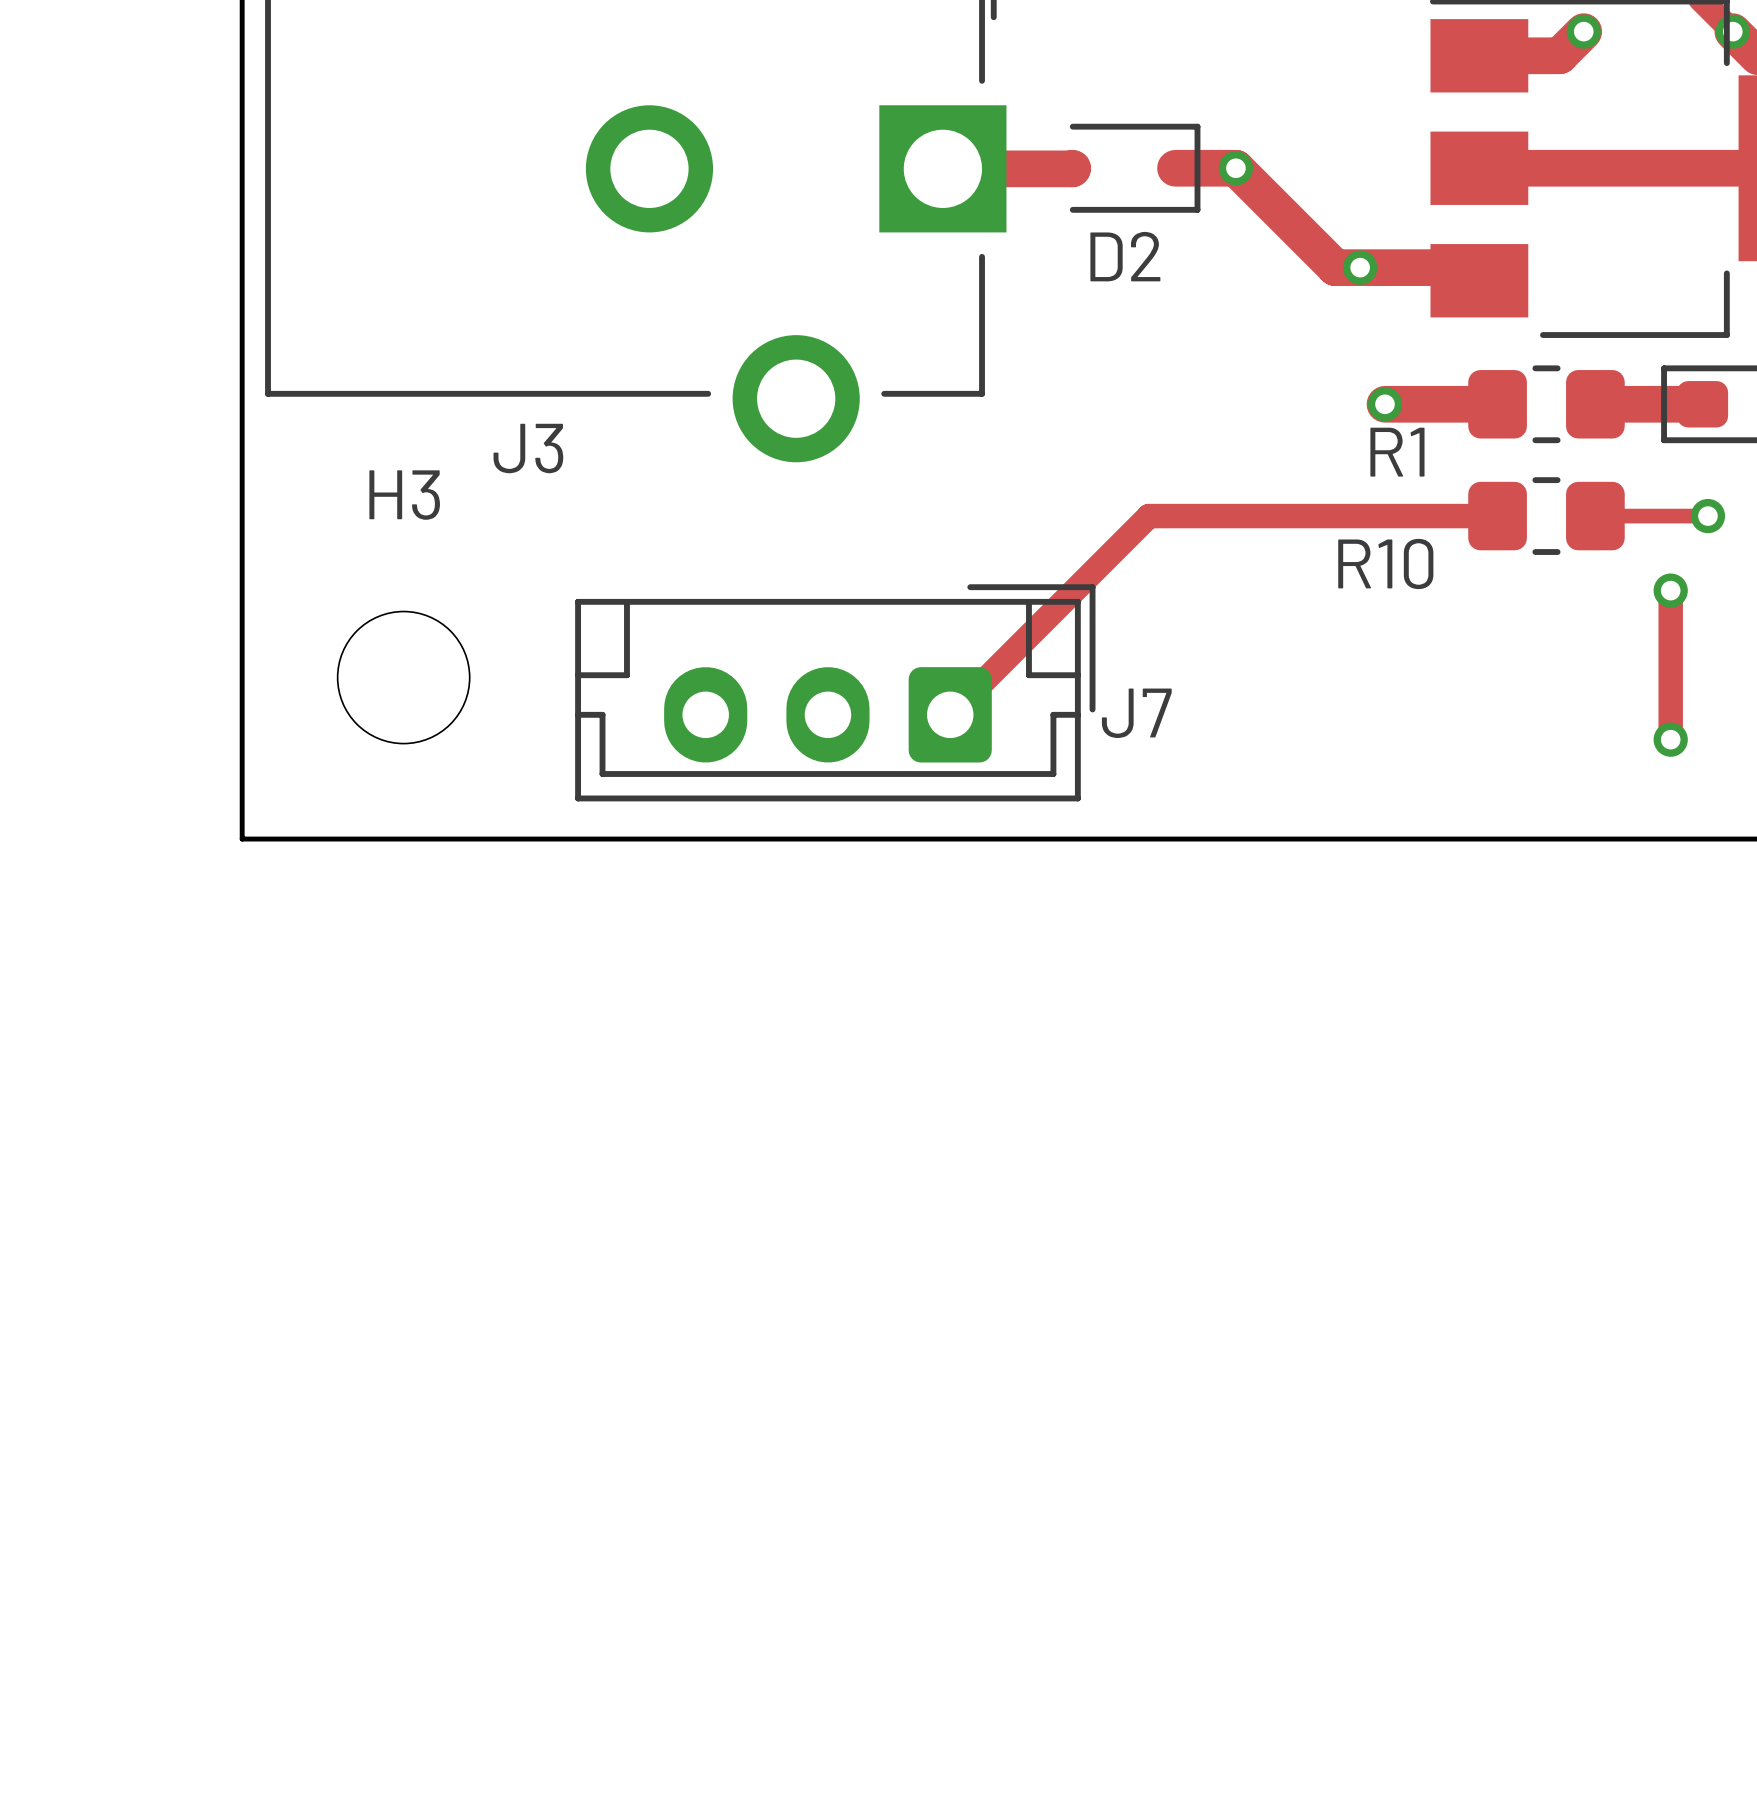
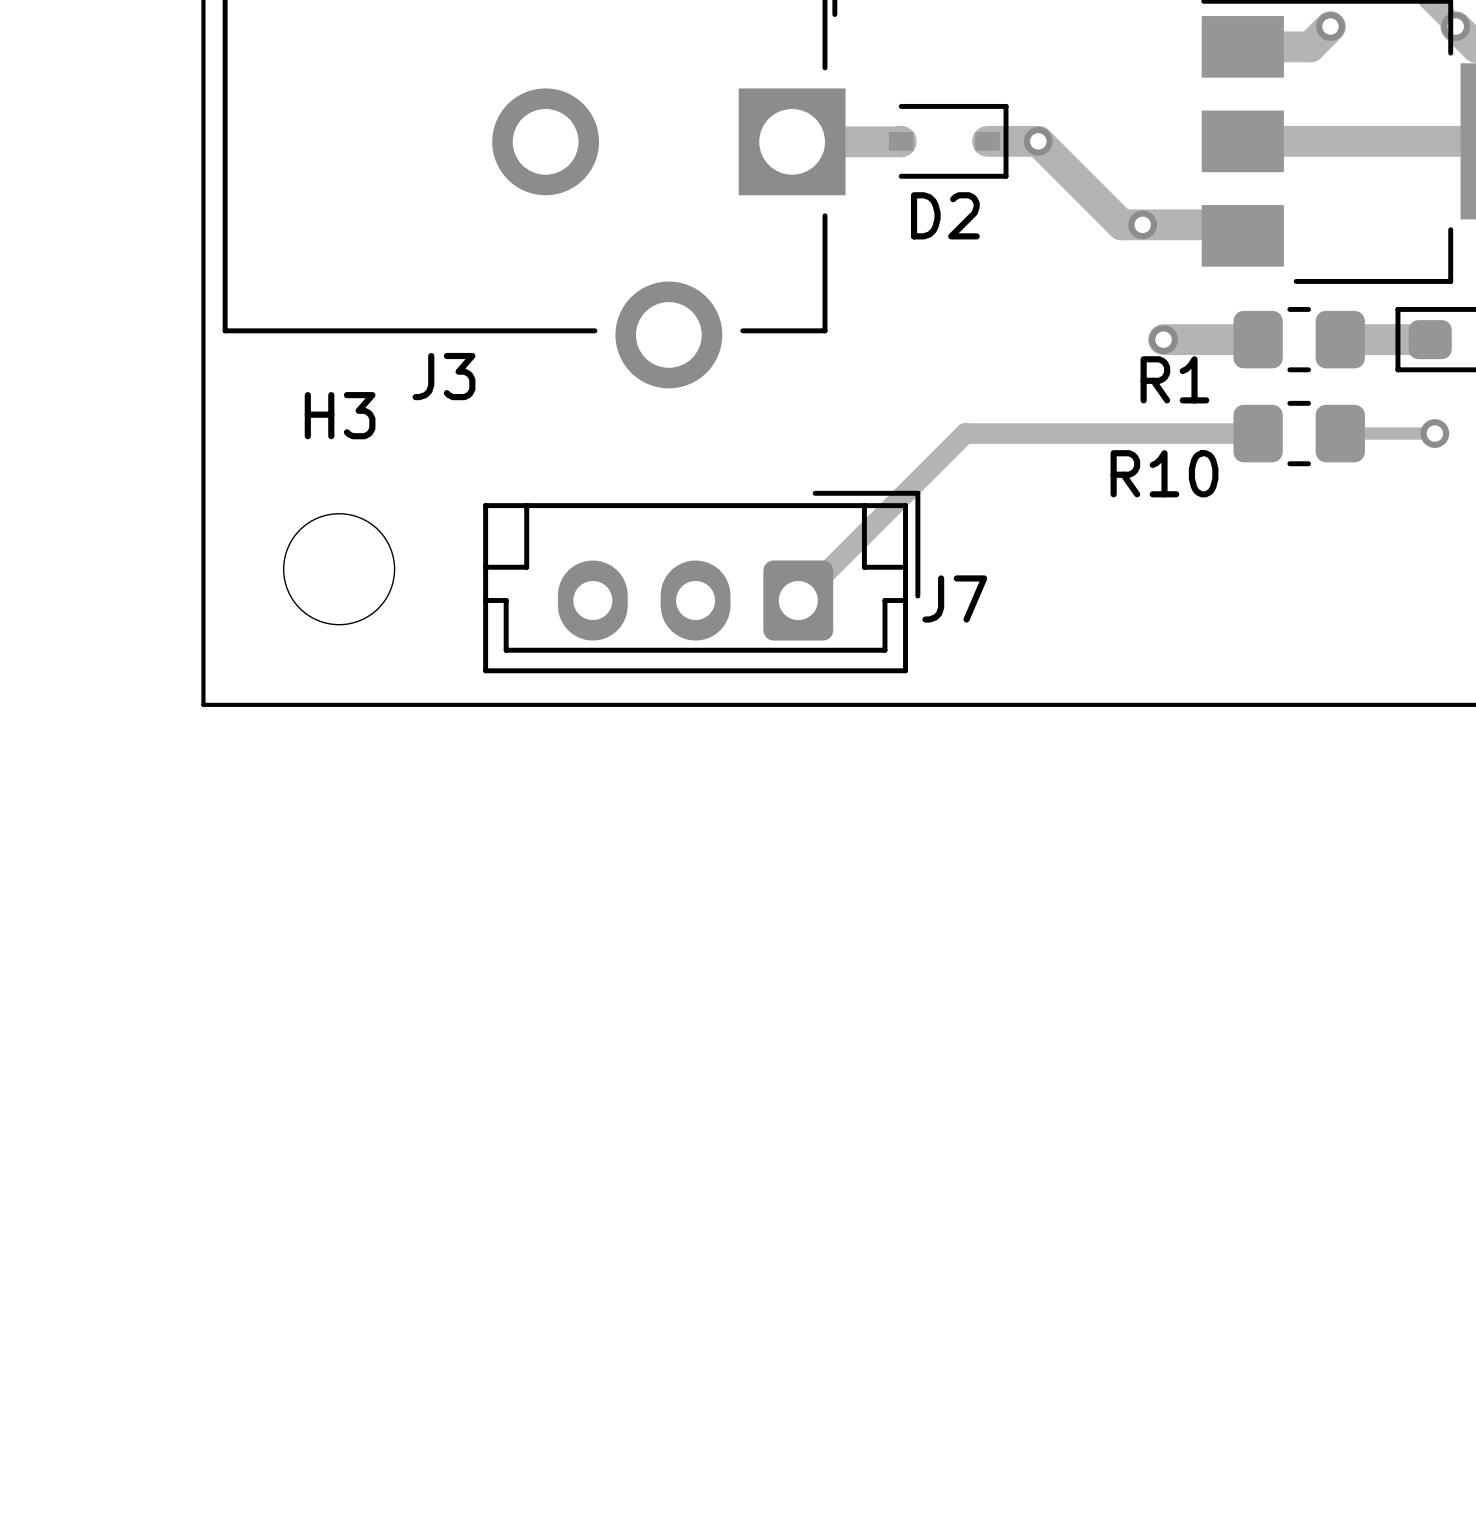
track: (1670, 590) (1670, 739) -> none
via: (1670, 590) -> none
via: (1670, 739) -> none

